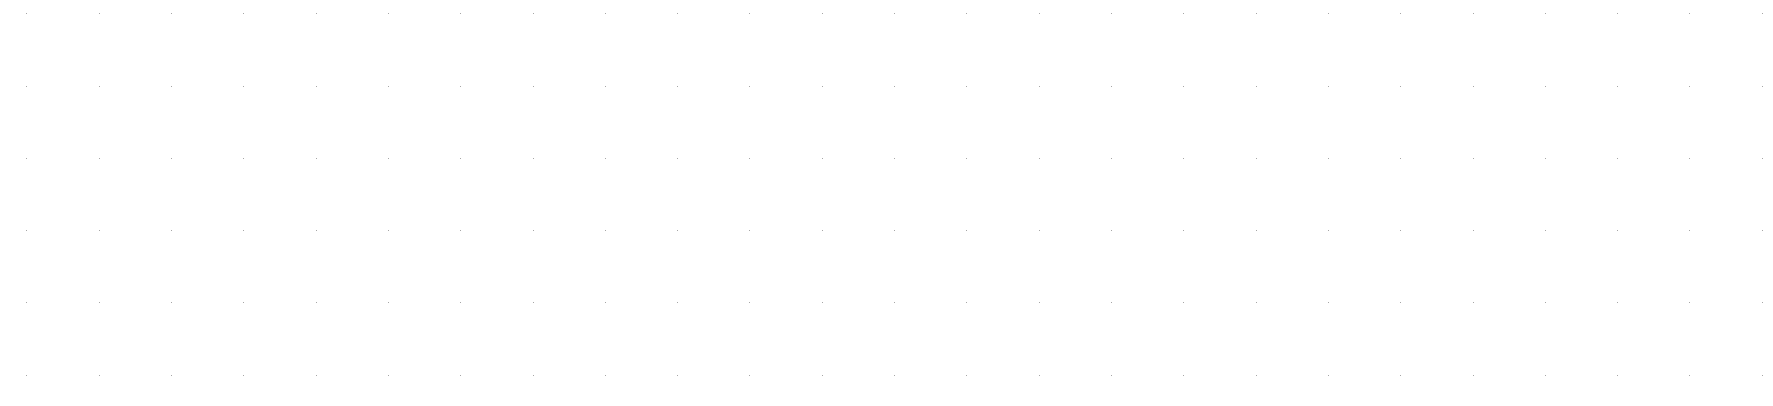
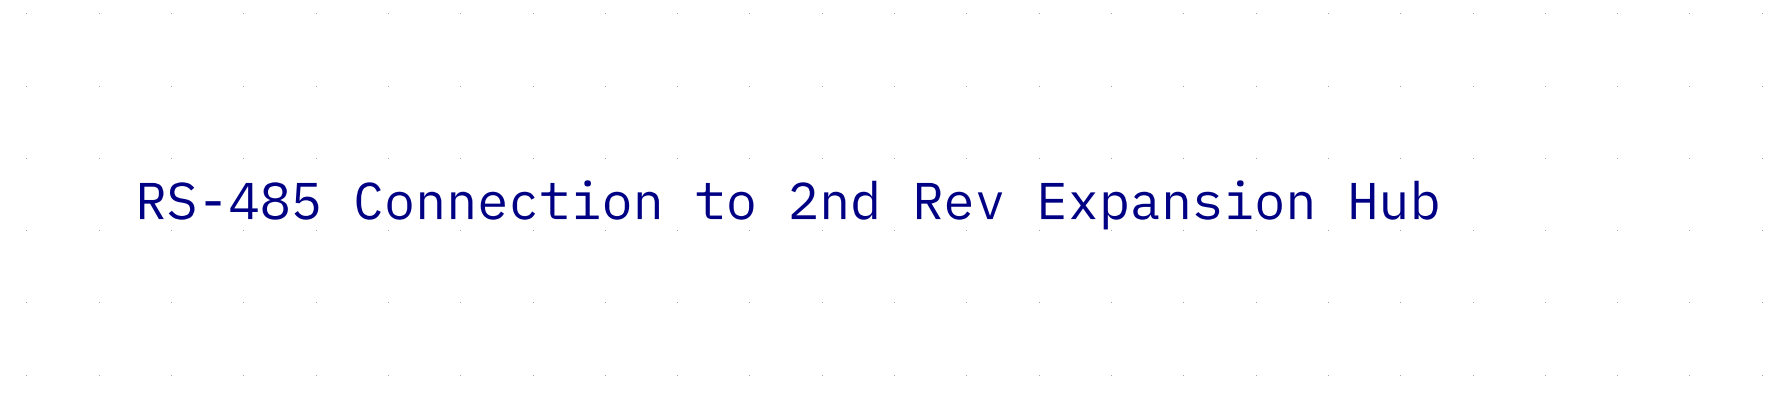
text: none -> RS-485 Connection to 2nd Rev Expansion Hub (788, 204)

